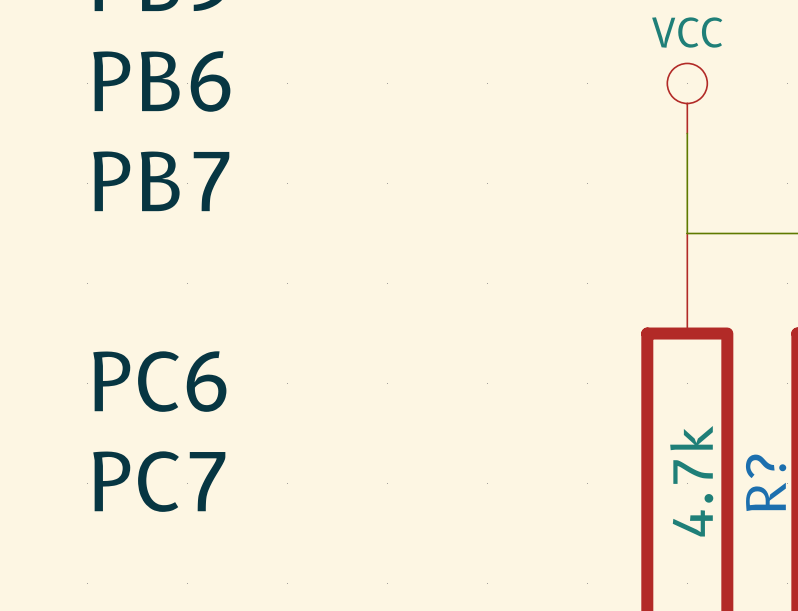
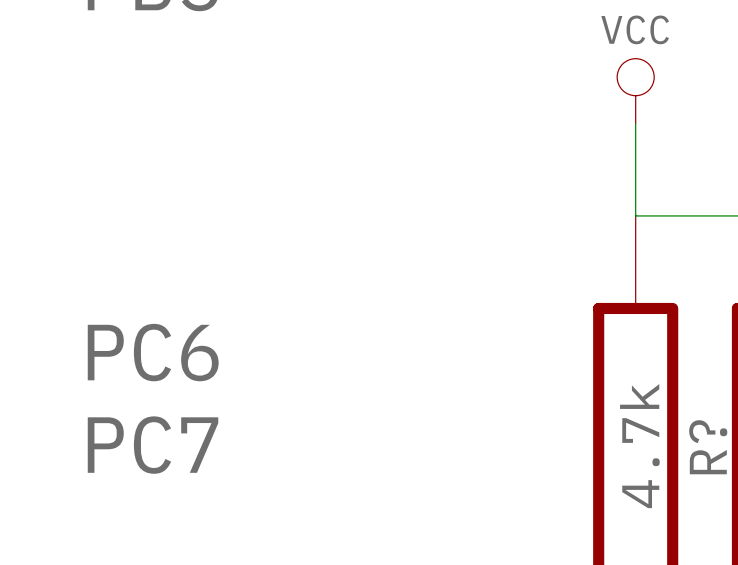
label: PB6 (161, 81) -> none
label: PB7 (161, 181) -> none

